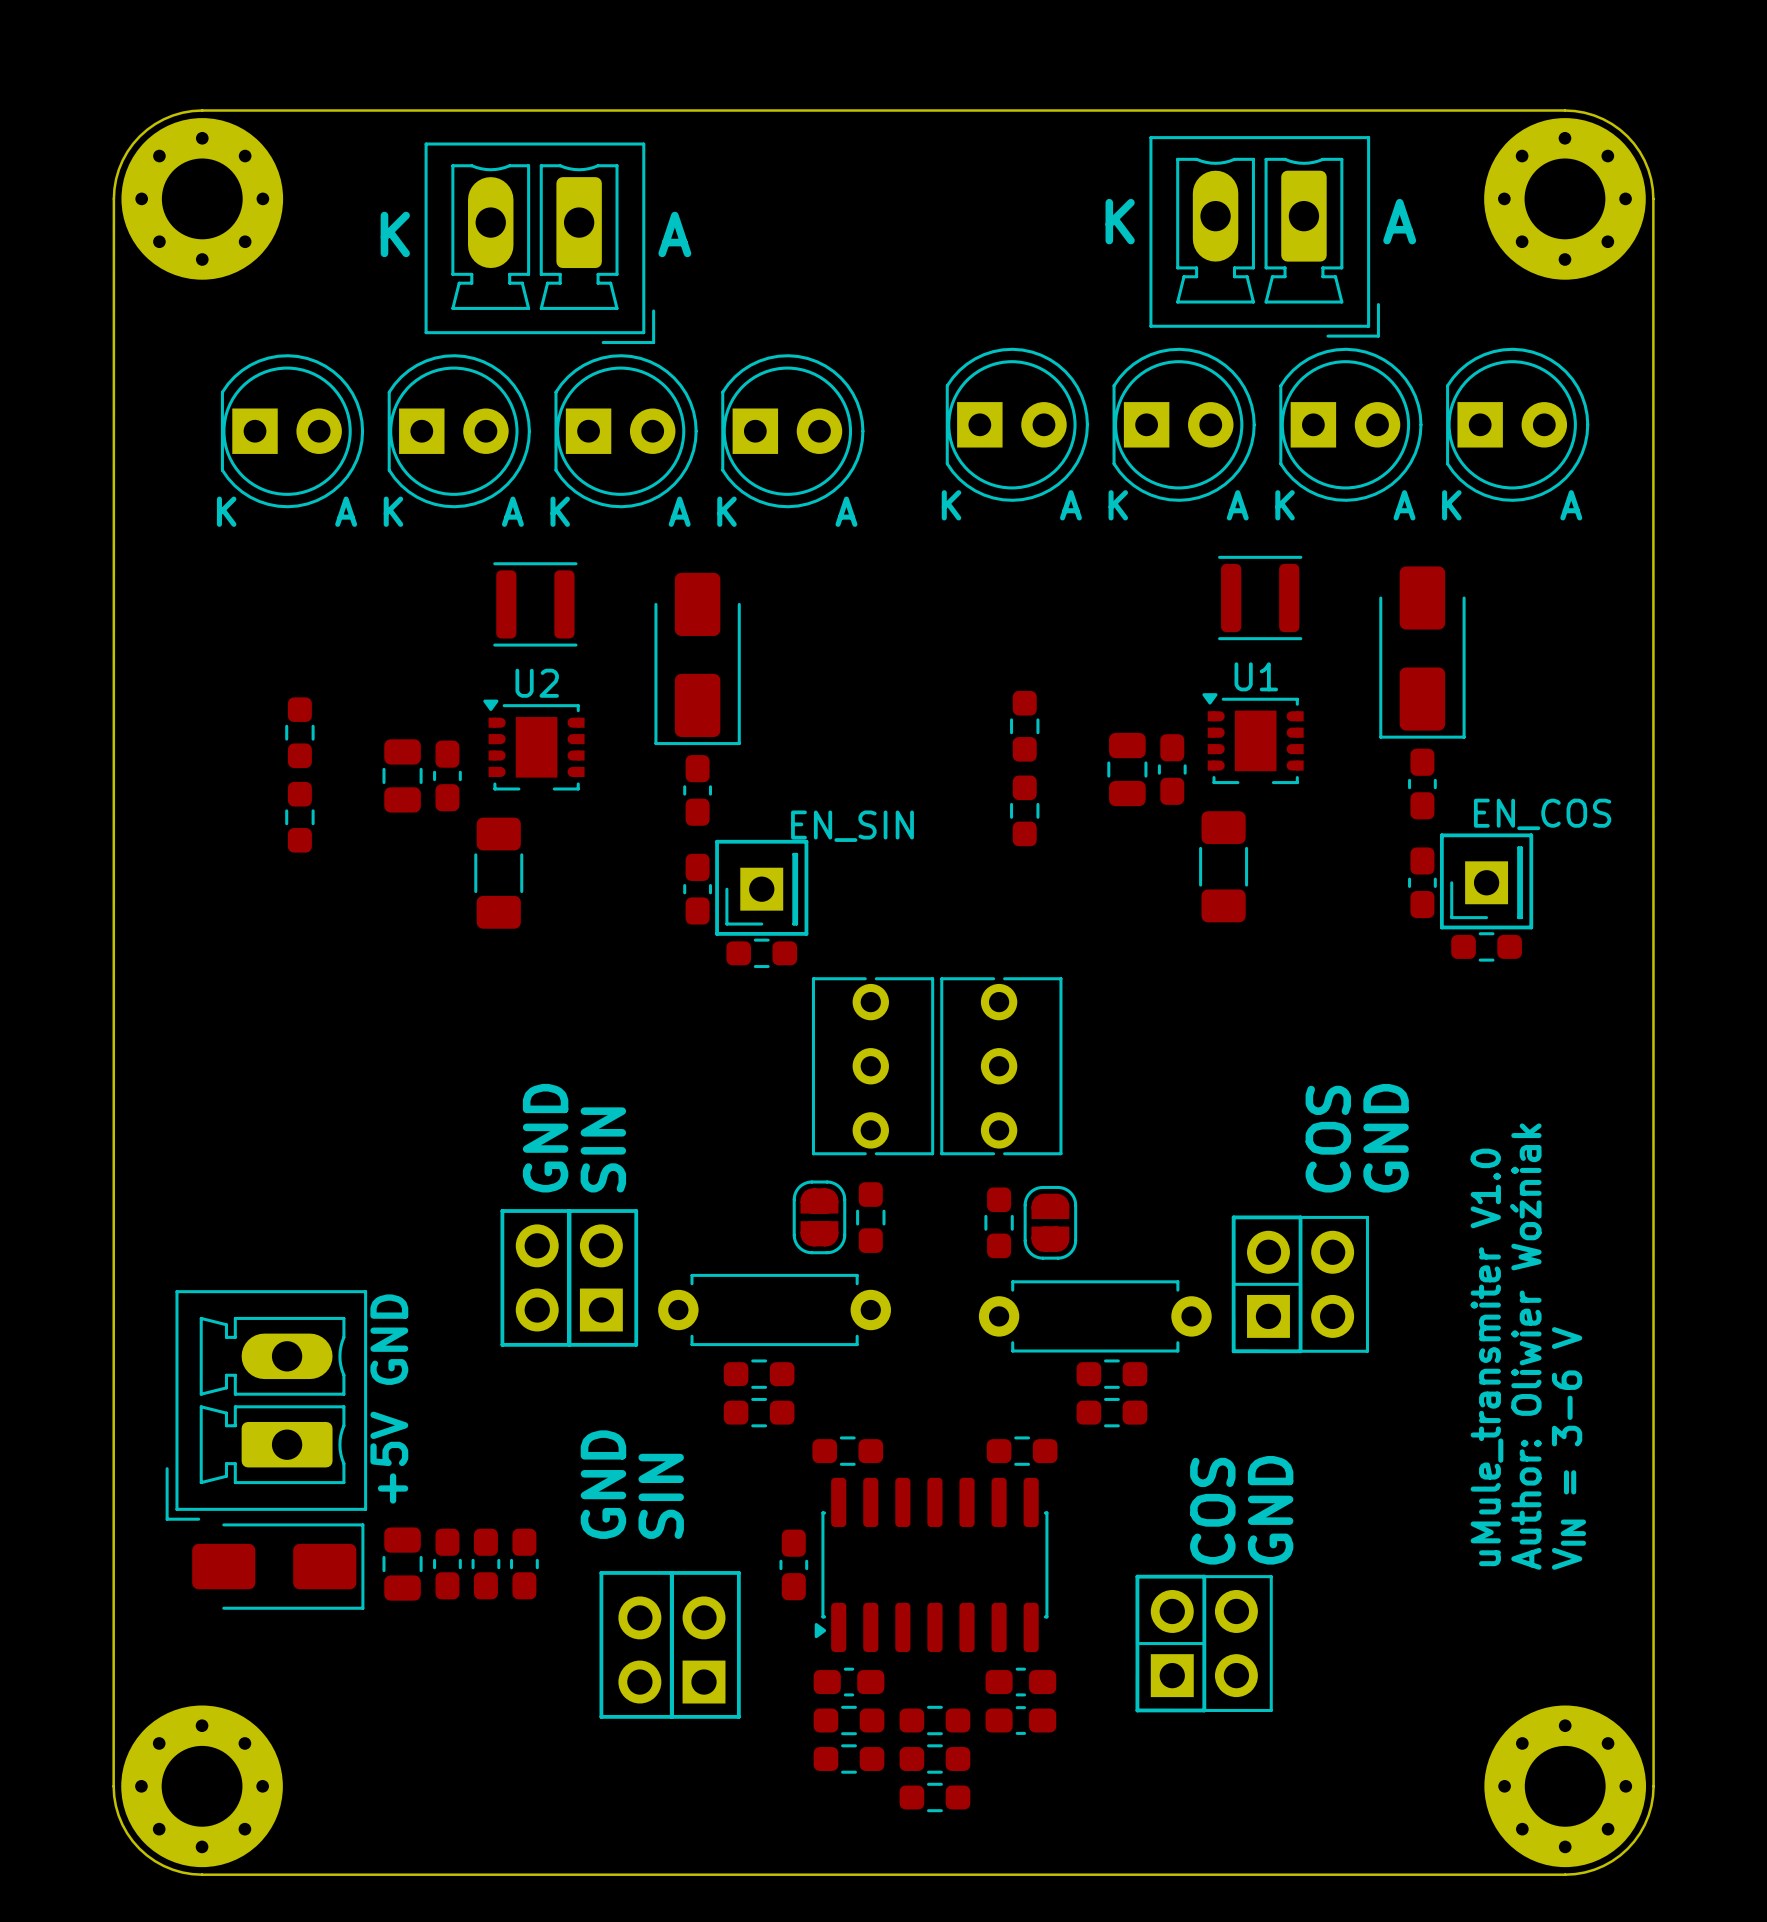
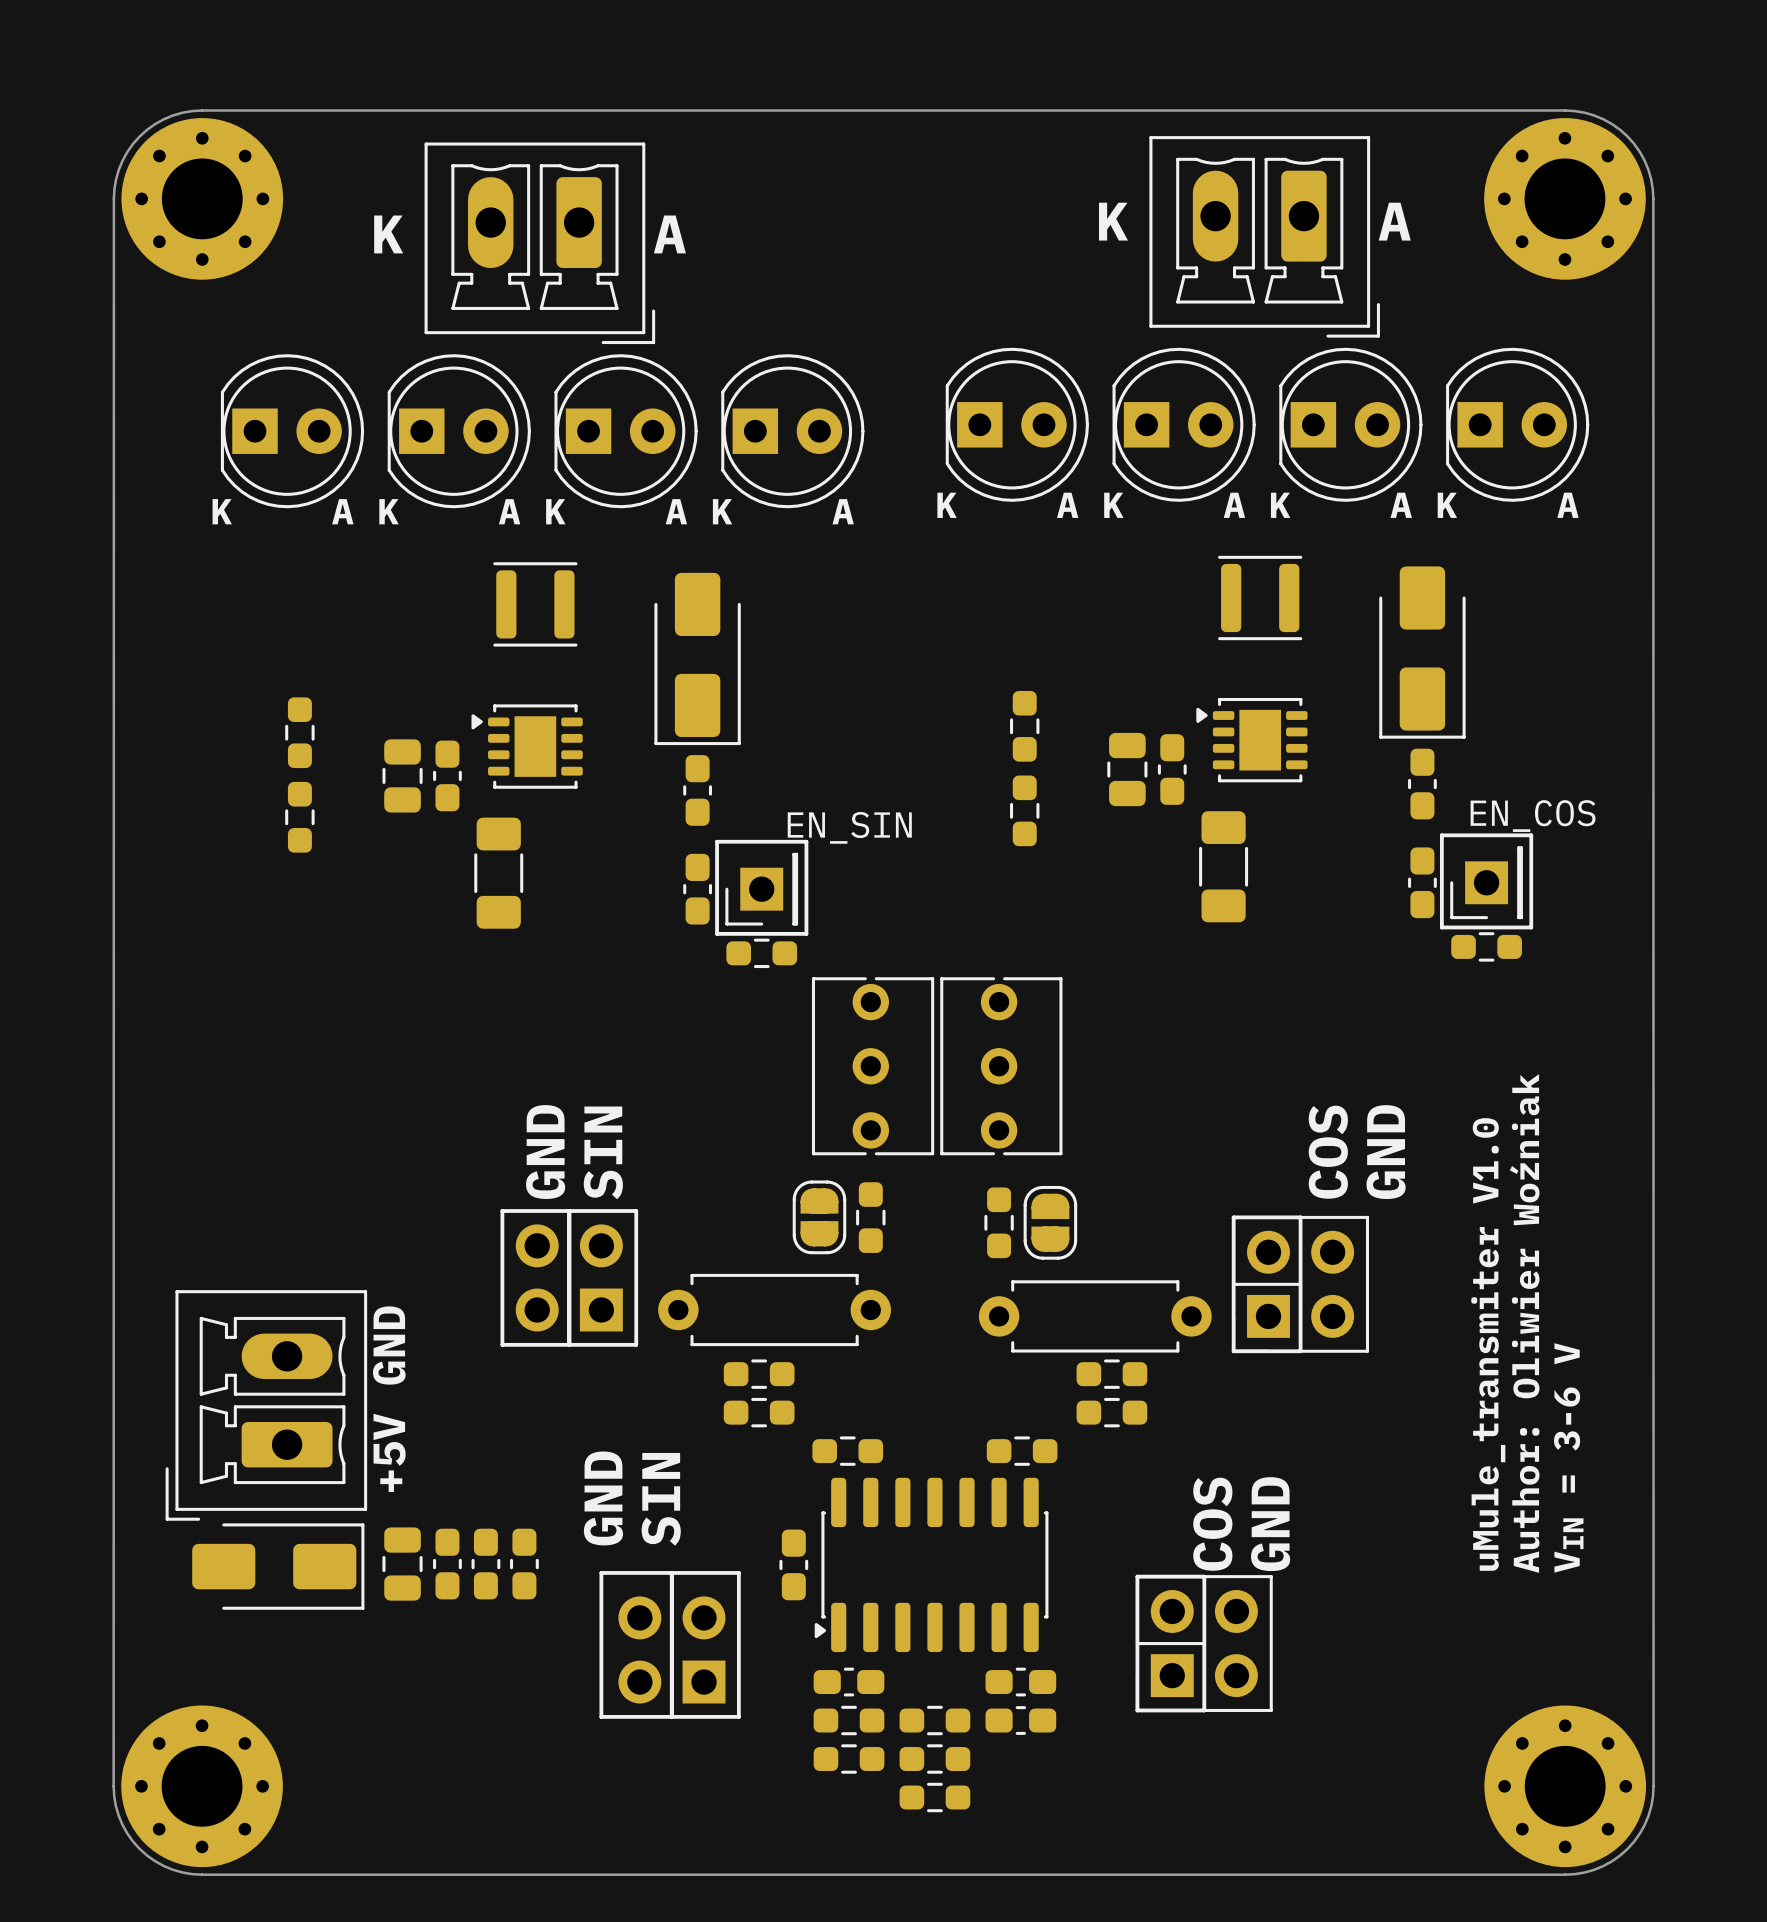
U1: (1253, 738) -> none
part: none -> (1251, 740)
U2: (533, 745) -> none
part: none -> (527, 746)

